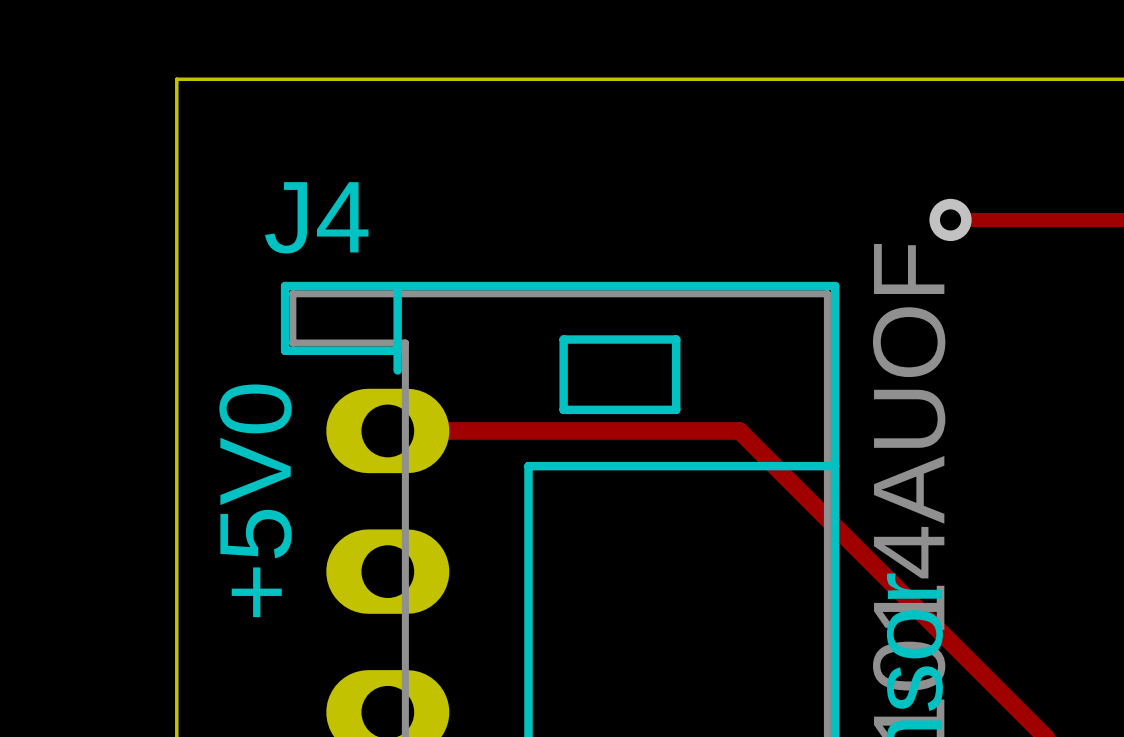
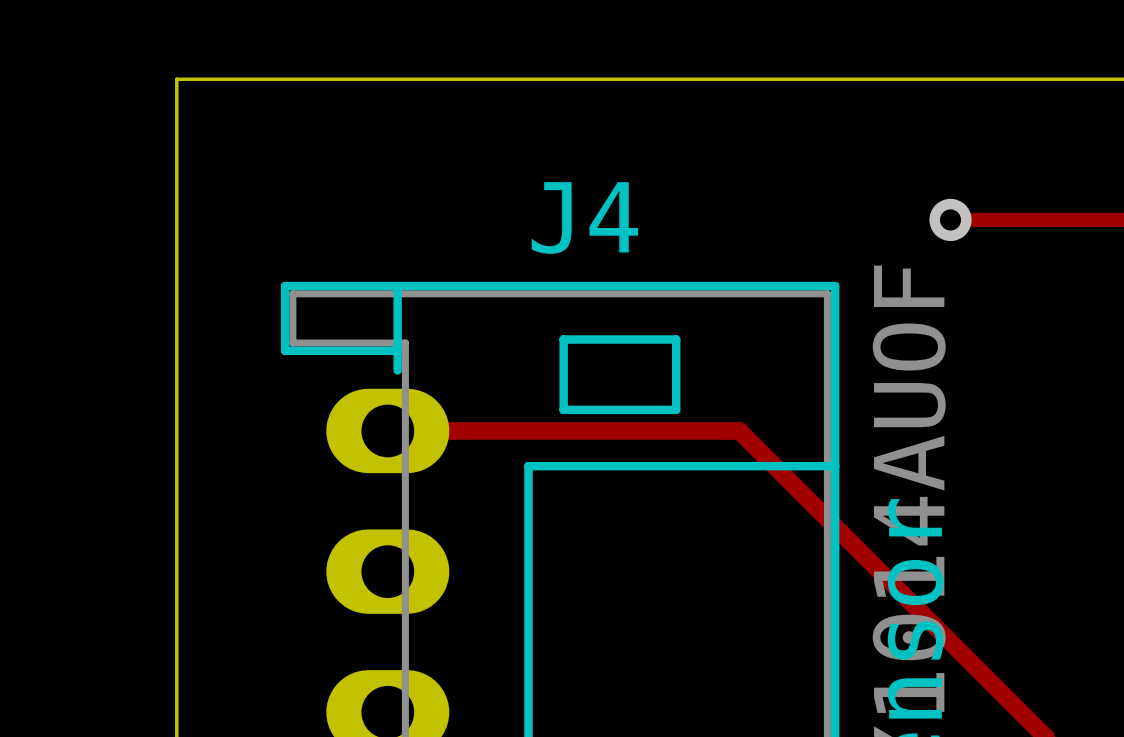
J4 name position: J4 (316, 217) -> J4 (584, 218)
text: +5V0 (255, 500) -> none

